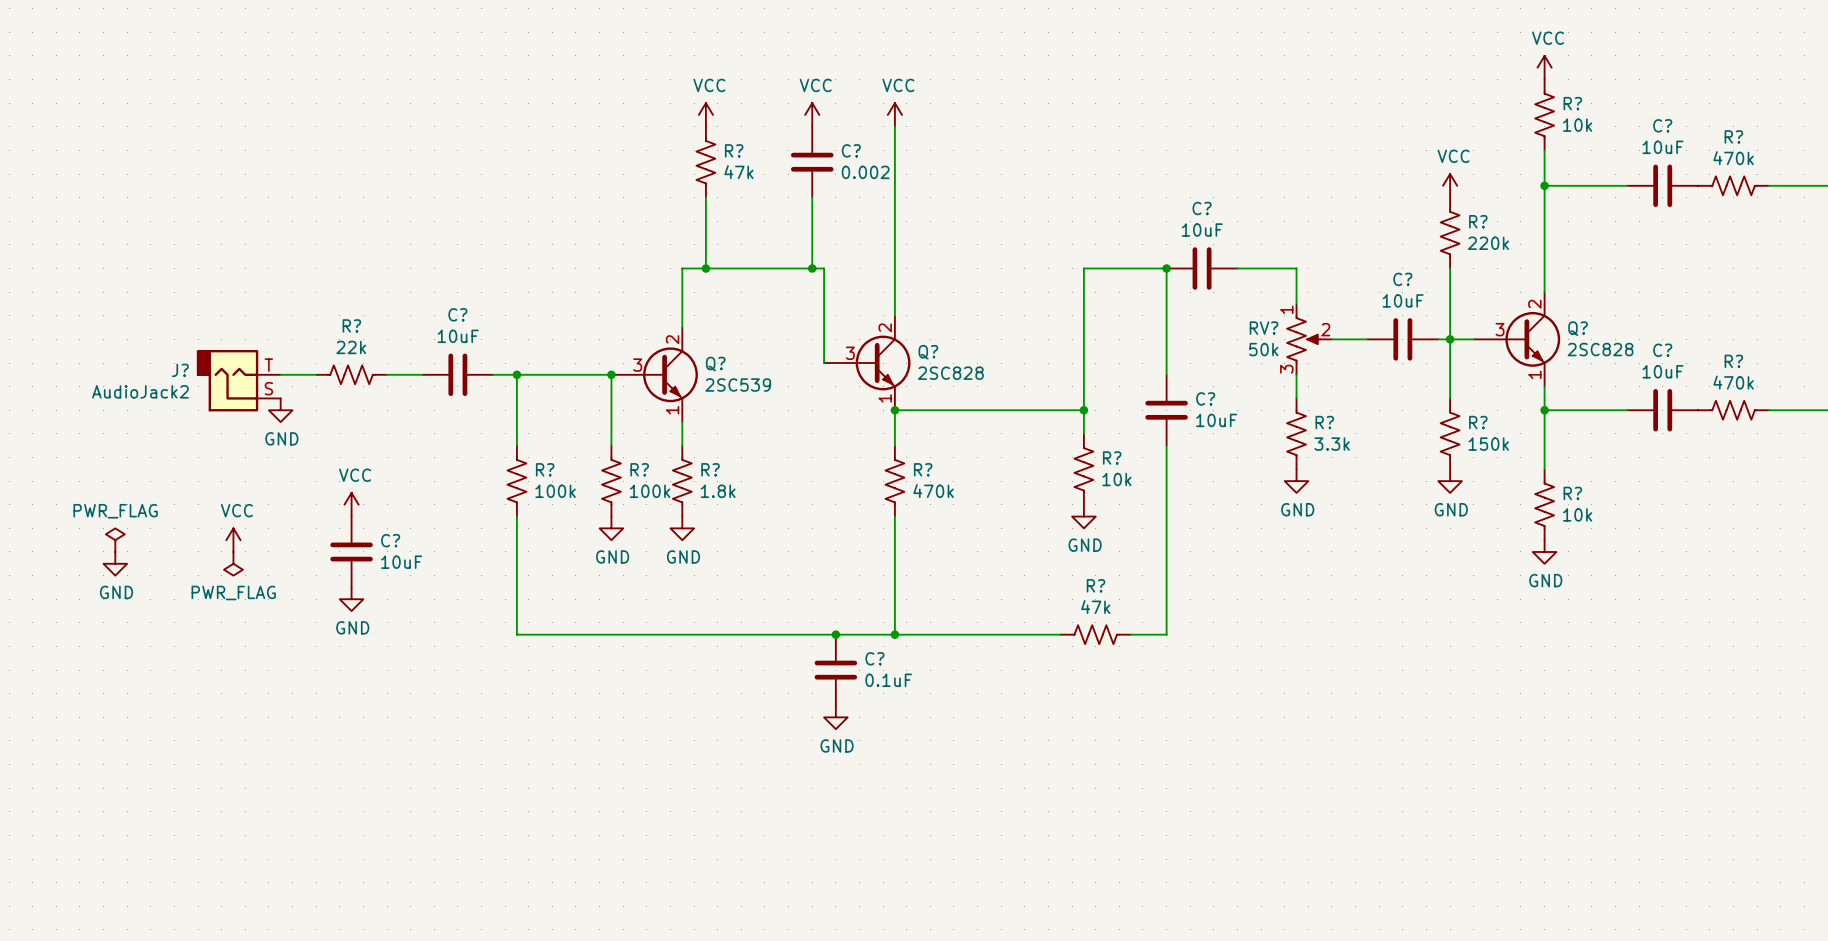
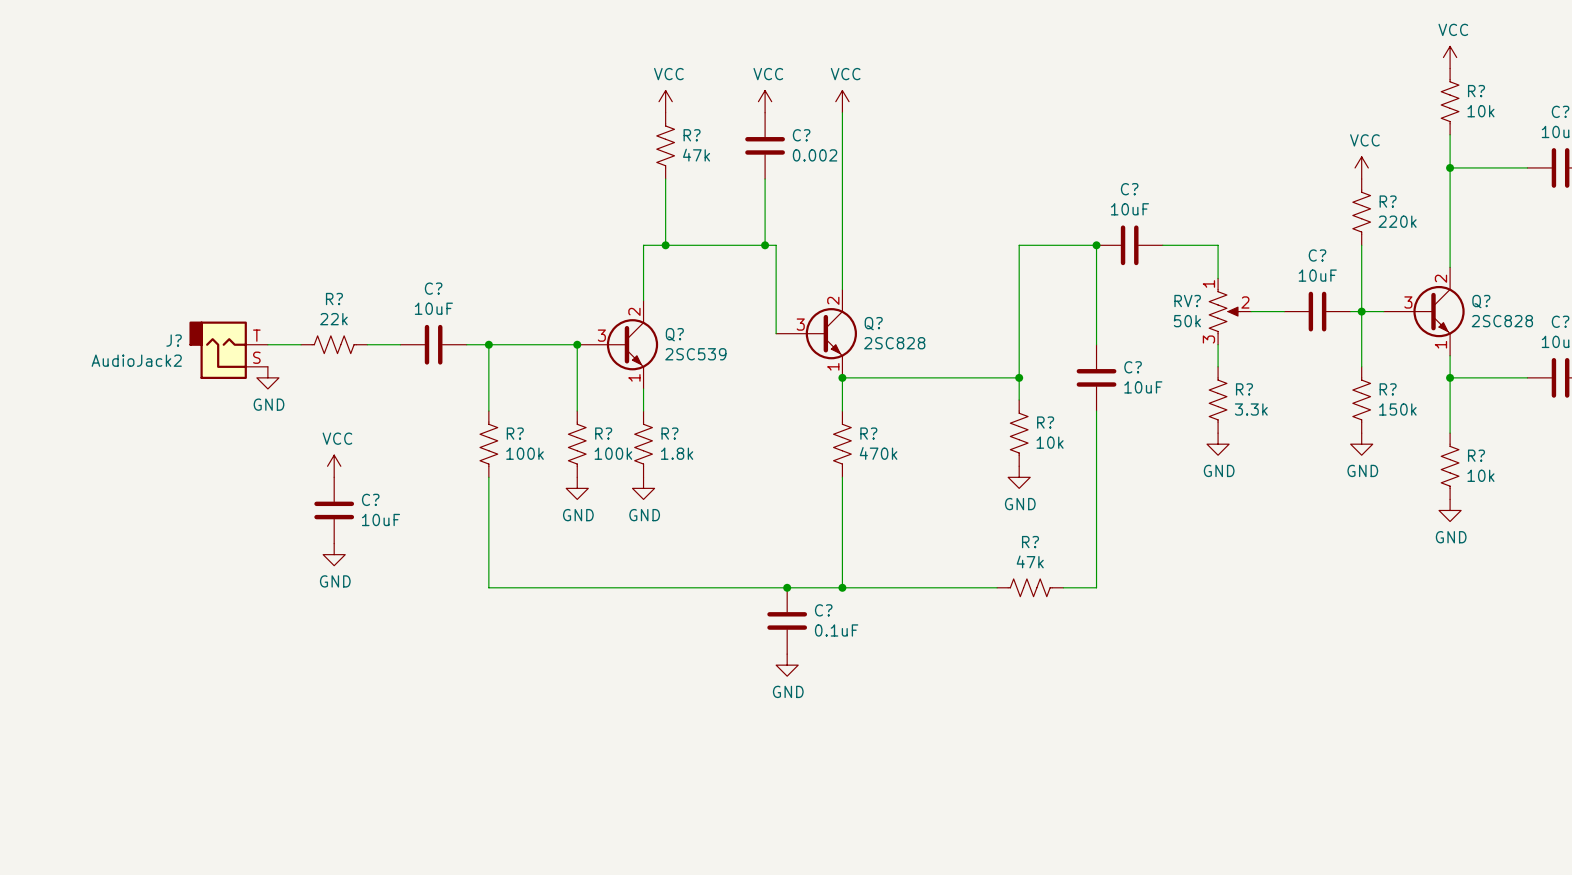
power symbol: PWR_FLAG (115, 540) -> none
power symbol: VCC (233, 540) -> none
power symbol: GND (115, 563) -> none
power symbol: PWR_FLAG (233, 563) -> none

